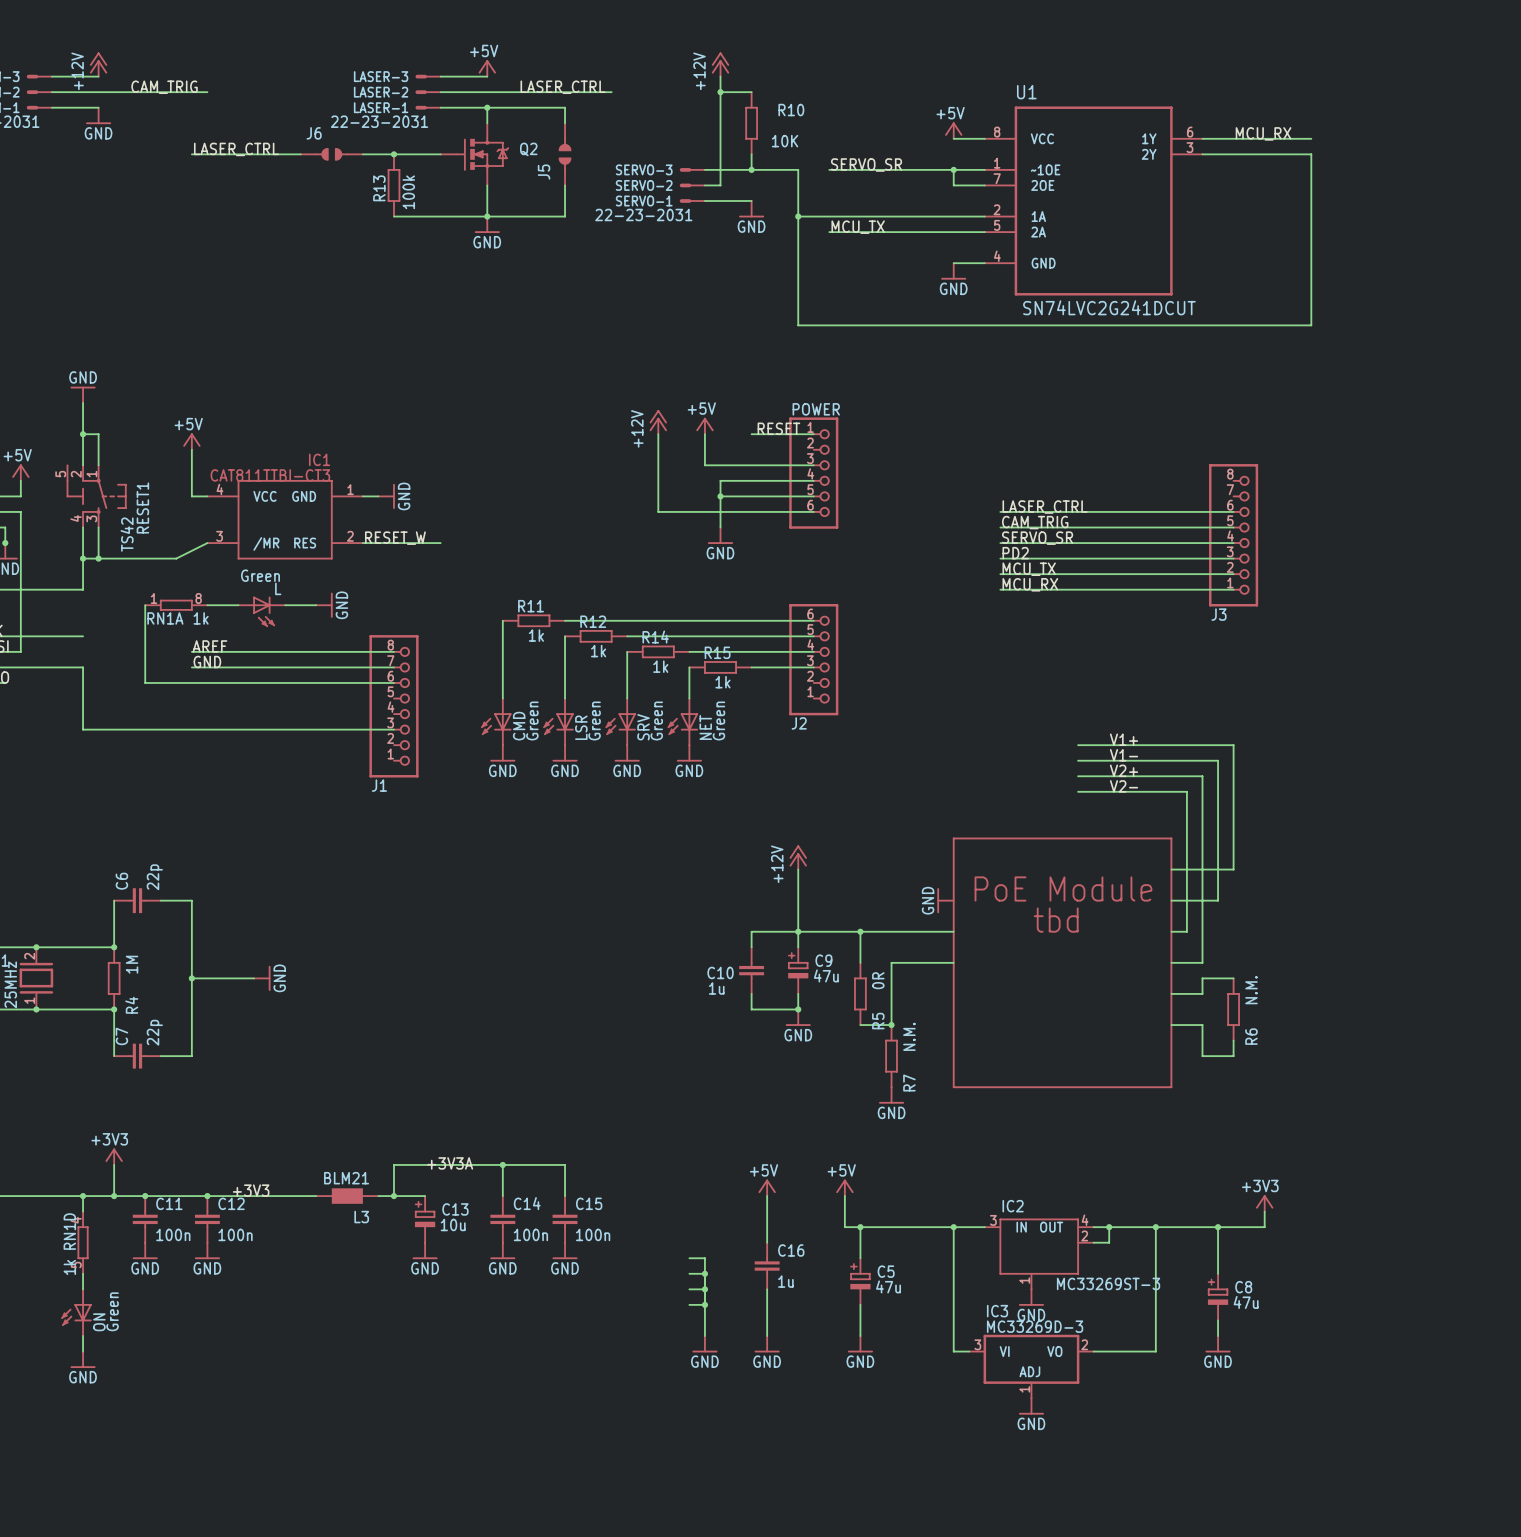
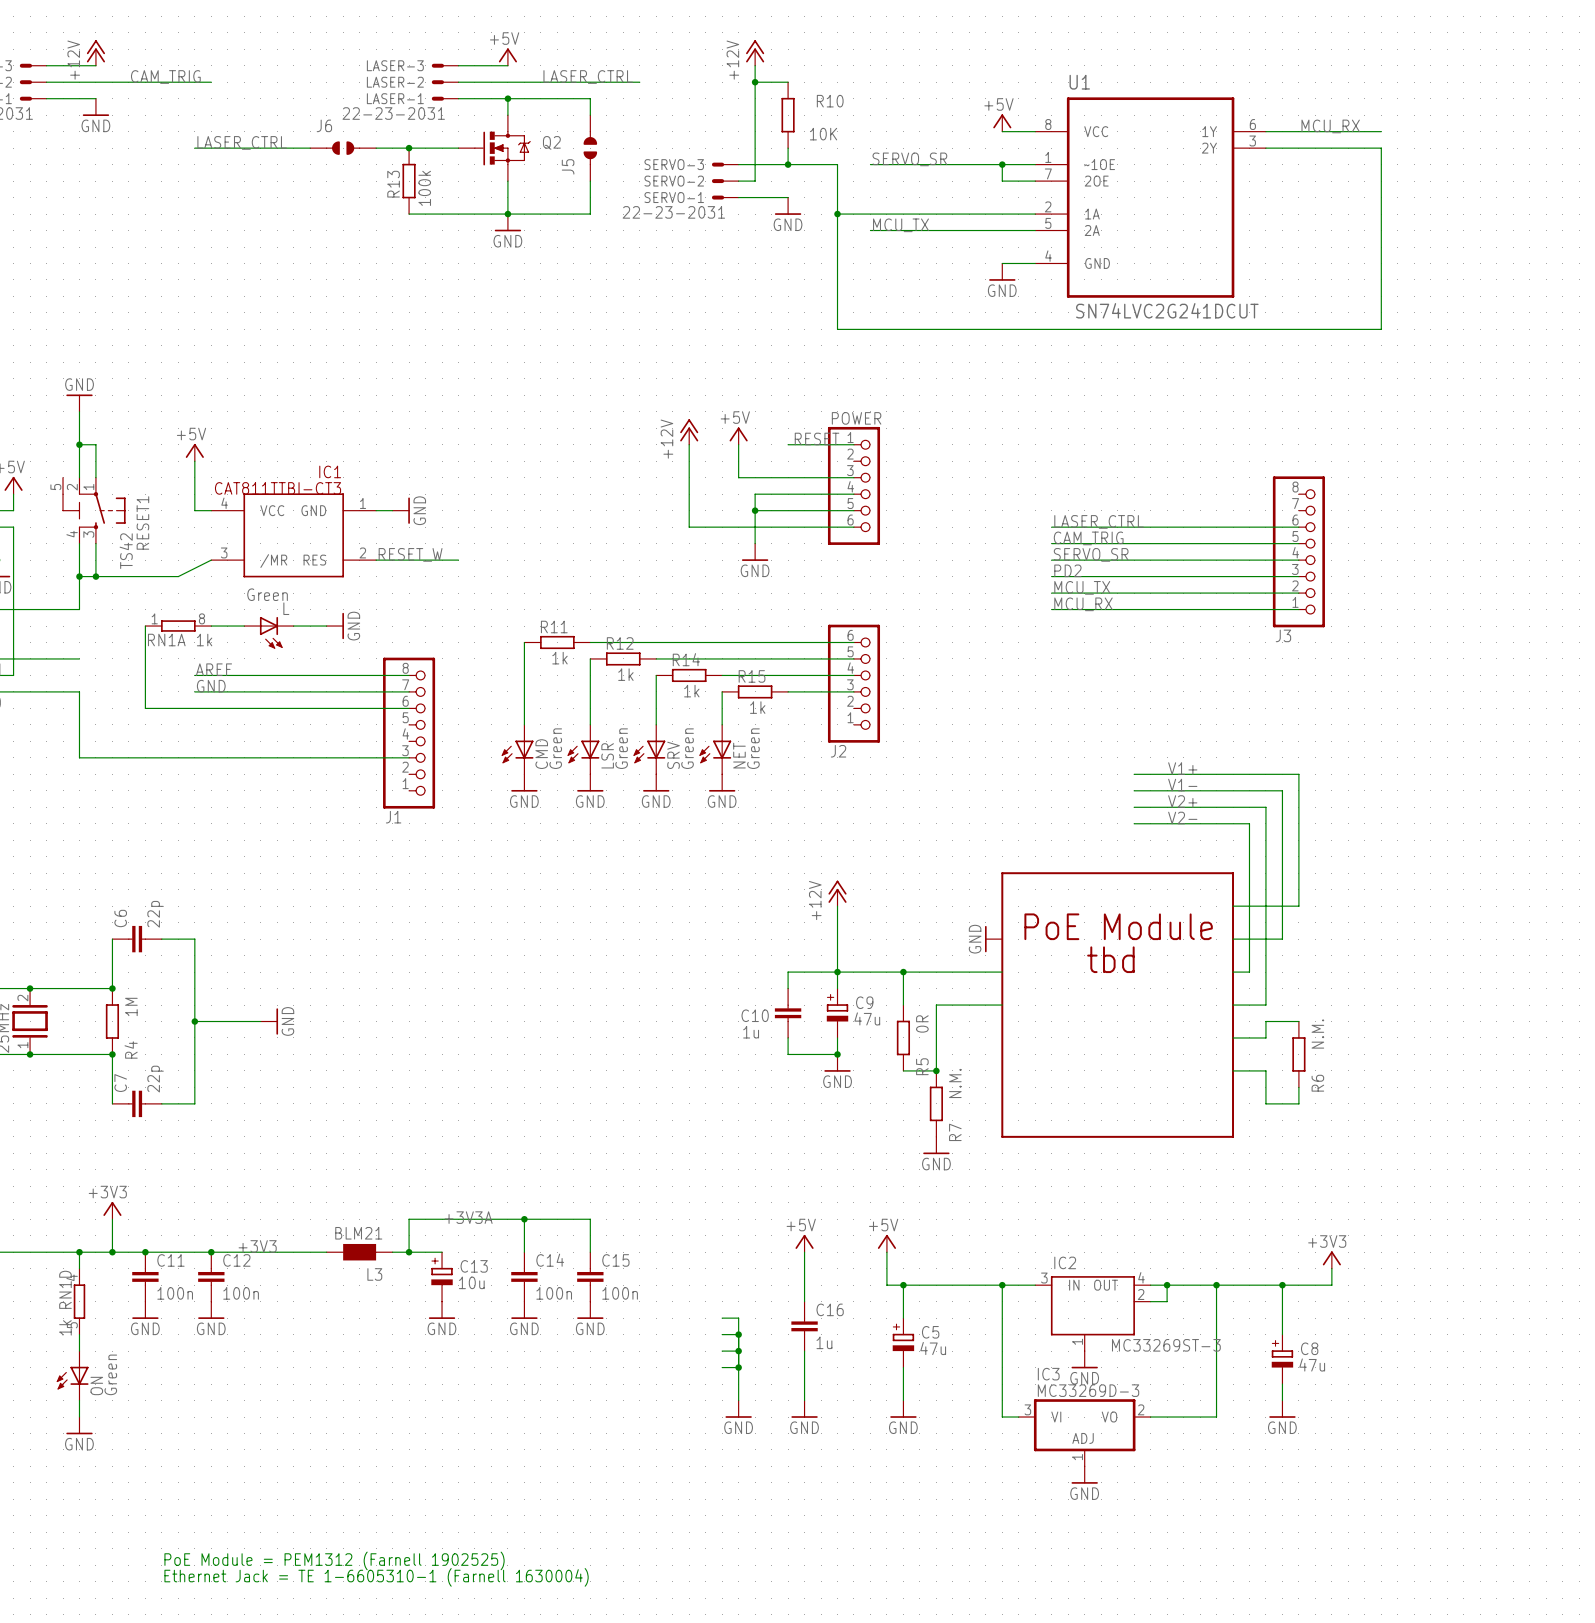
text: none -> PoE Module = PEM1312 (Farnell 1902525) (334, 1560)
text: none -> Ethernet Jack = TE 1-6605310-1 (Farnell 1630004) (376, 1577)

